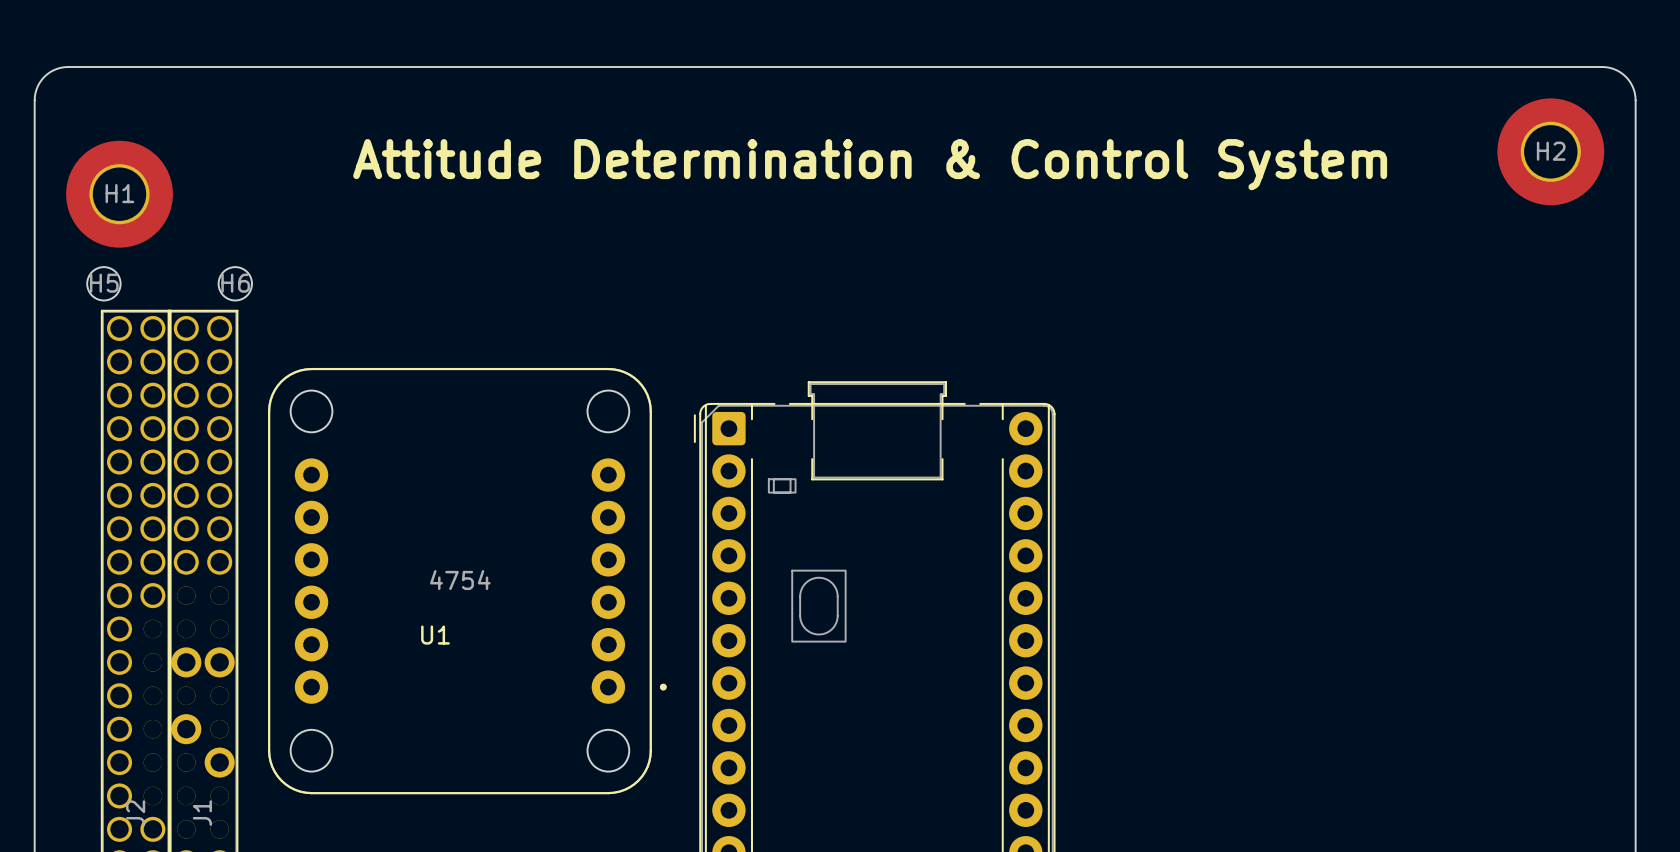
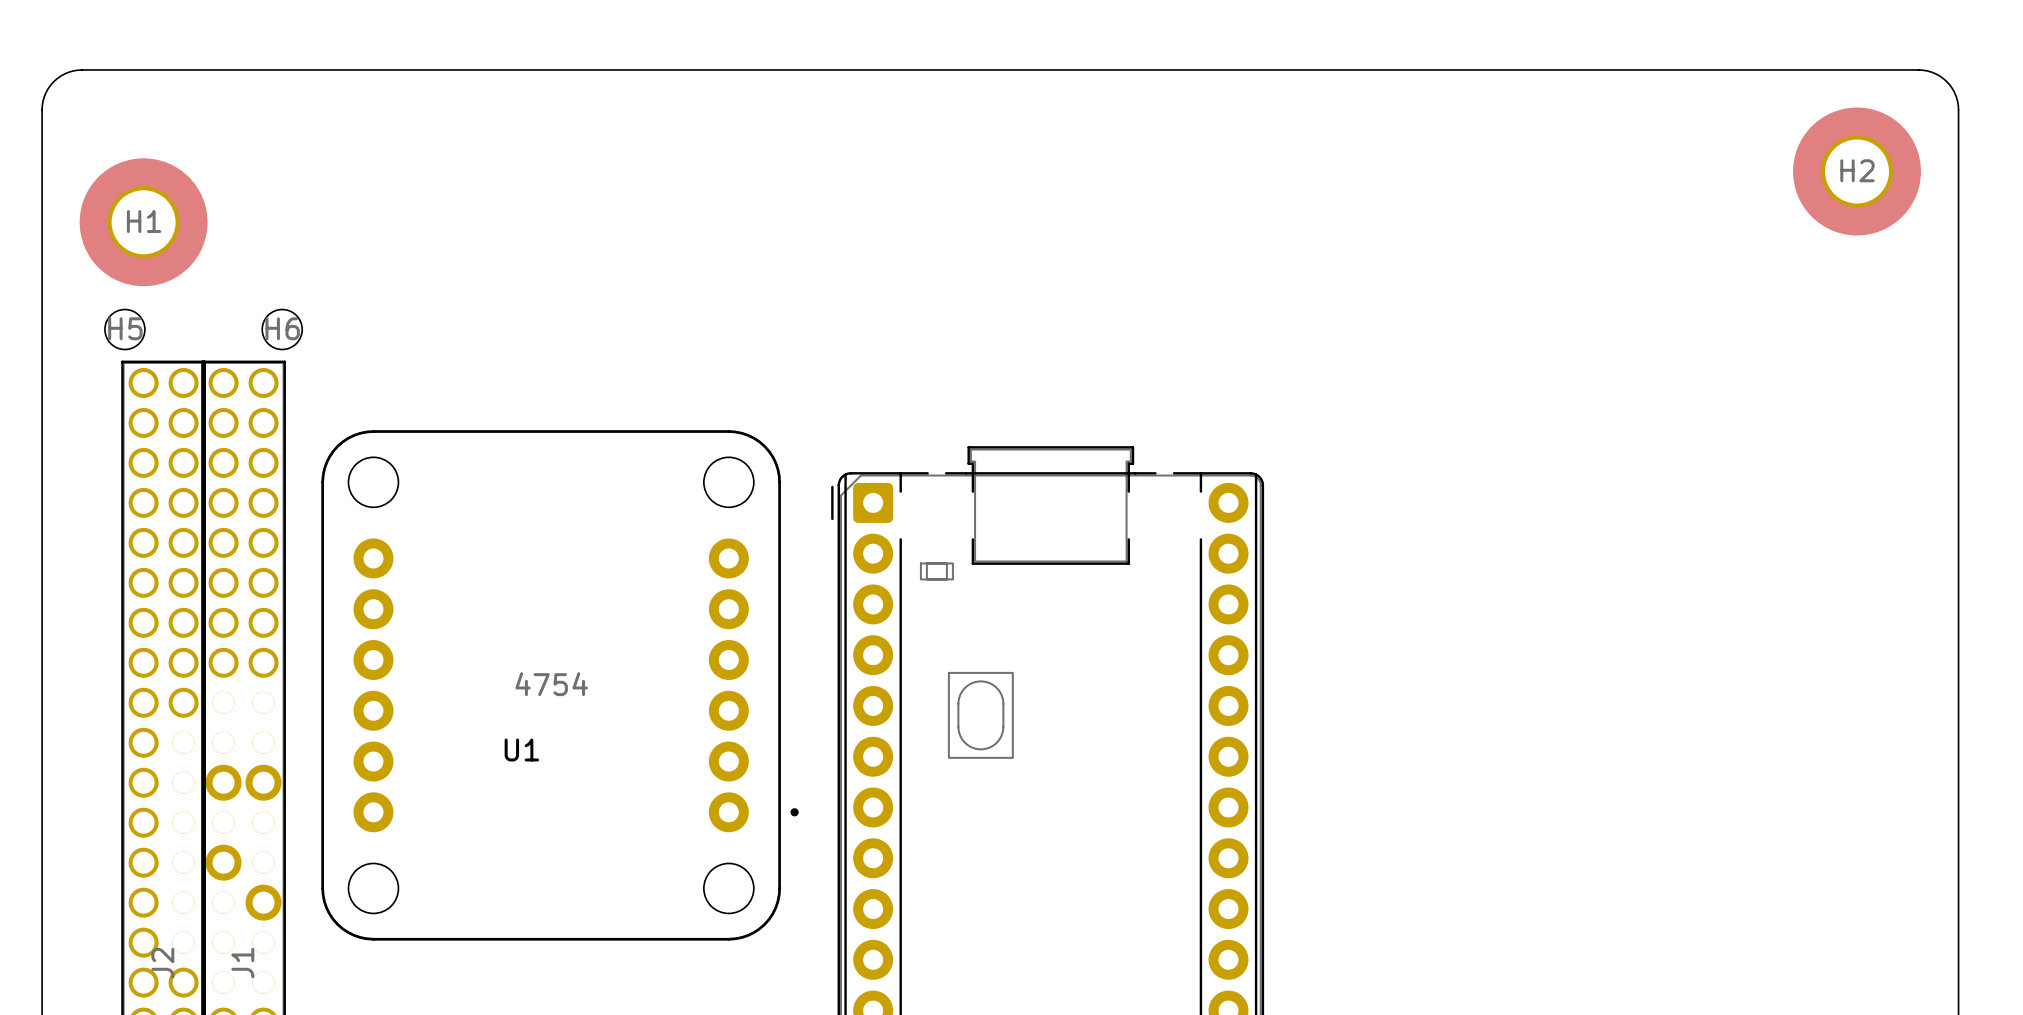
text: Attitude Determination & Control System (870, 164) -> none

